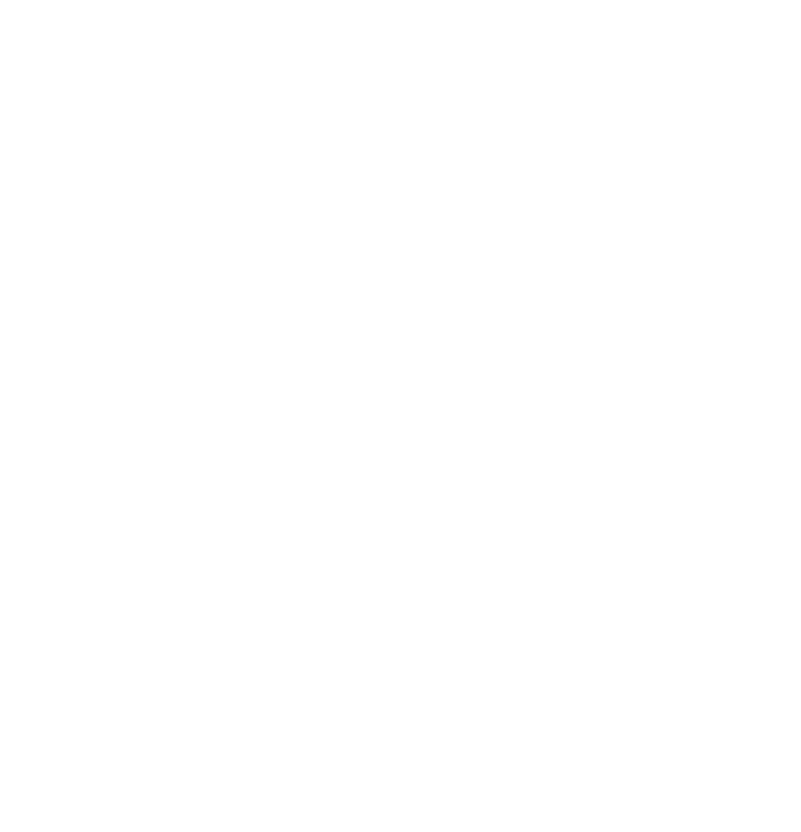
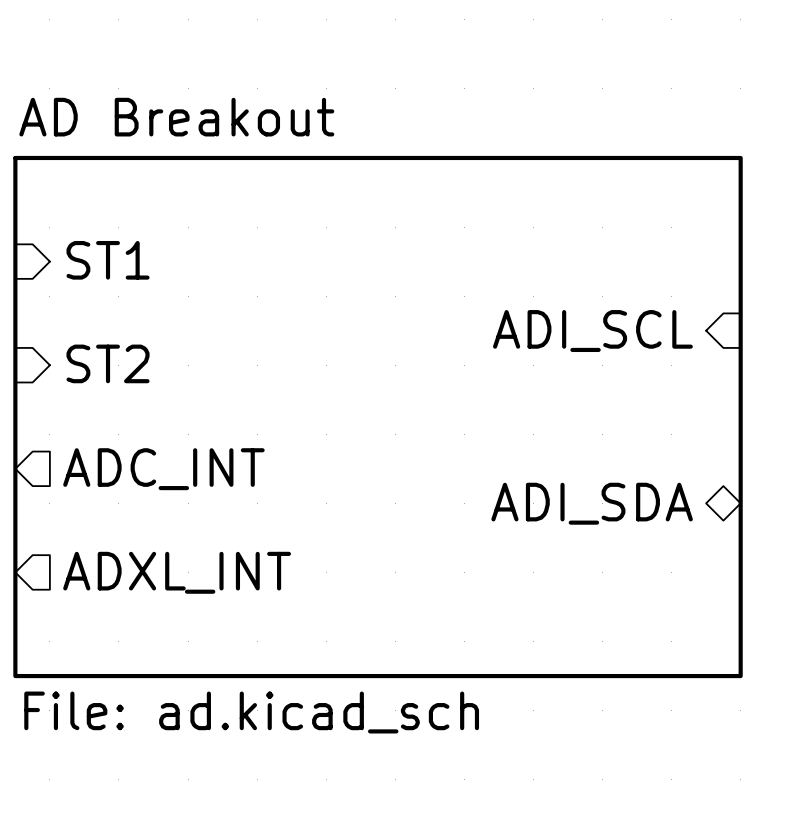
sheet pin: none -> ST1 (108, 260)
sheet pin: none -> ADI_SCL (592, 331)
sheet pin: none -> ST2 (108, 363)
sheet AD Breakout: none -> File: ad.kicad_sch (378, 417)
sheet pin: none -> ADC_INT (163, 469)
sheet pin: none -> ADI_SDA (592, 503)
sheet pin: none -> ADXL_INT (177, 572)

